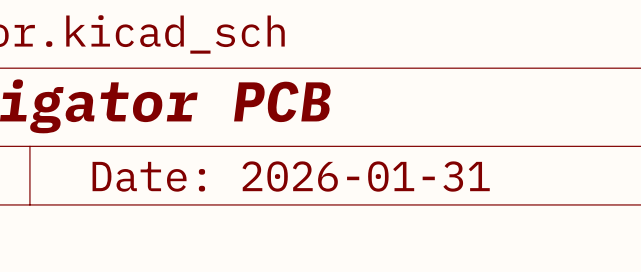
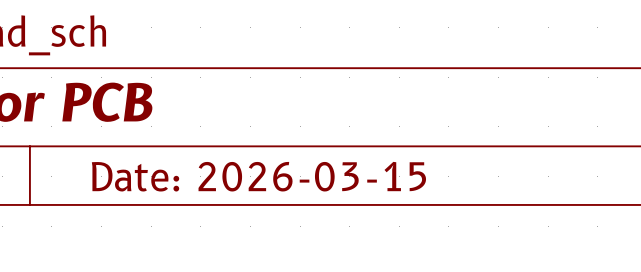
title block: Date: 2026-01-31 (291, 176) -> Date: 2026-03-15 (258, 176)

